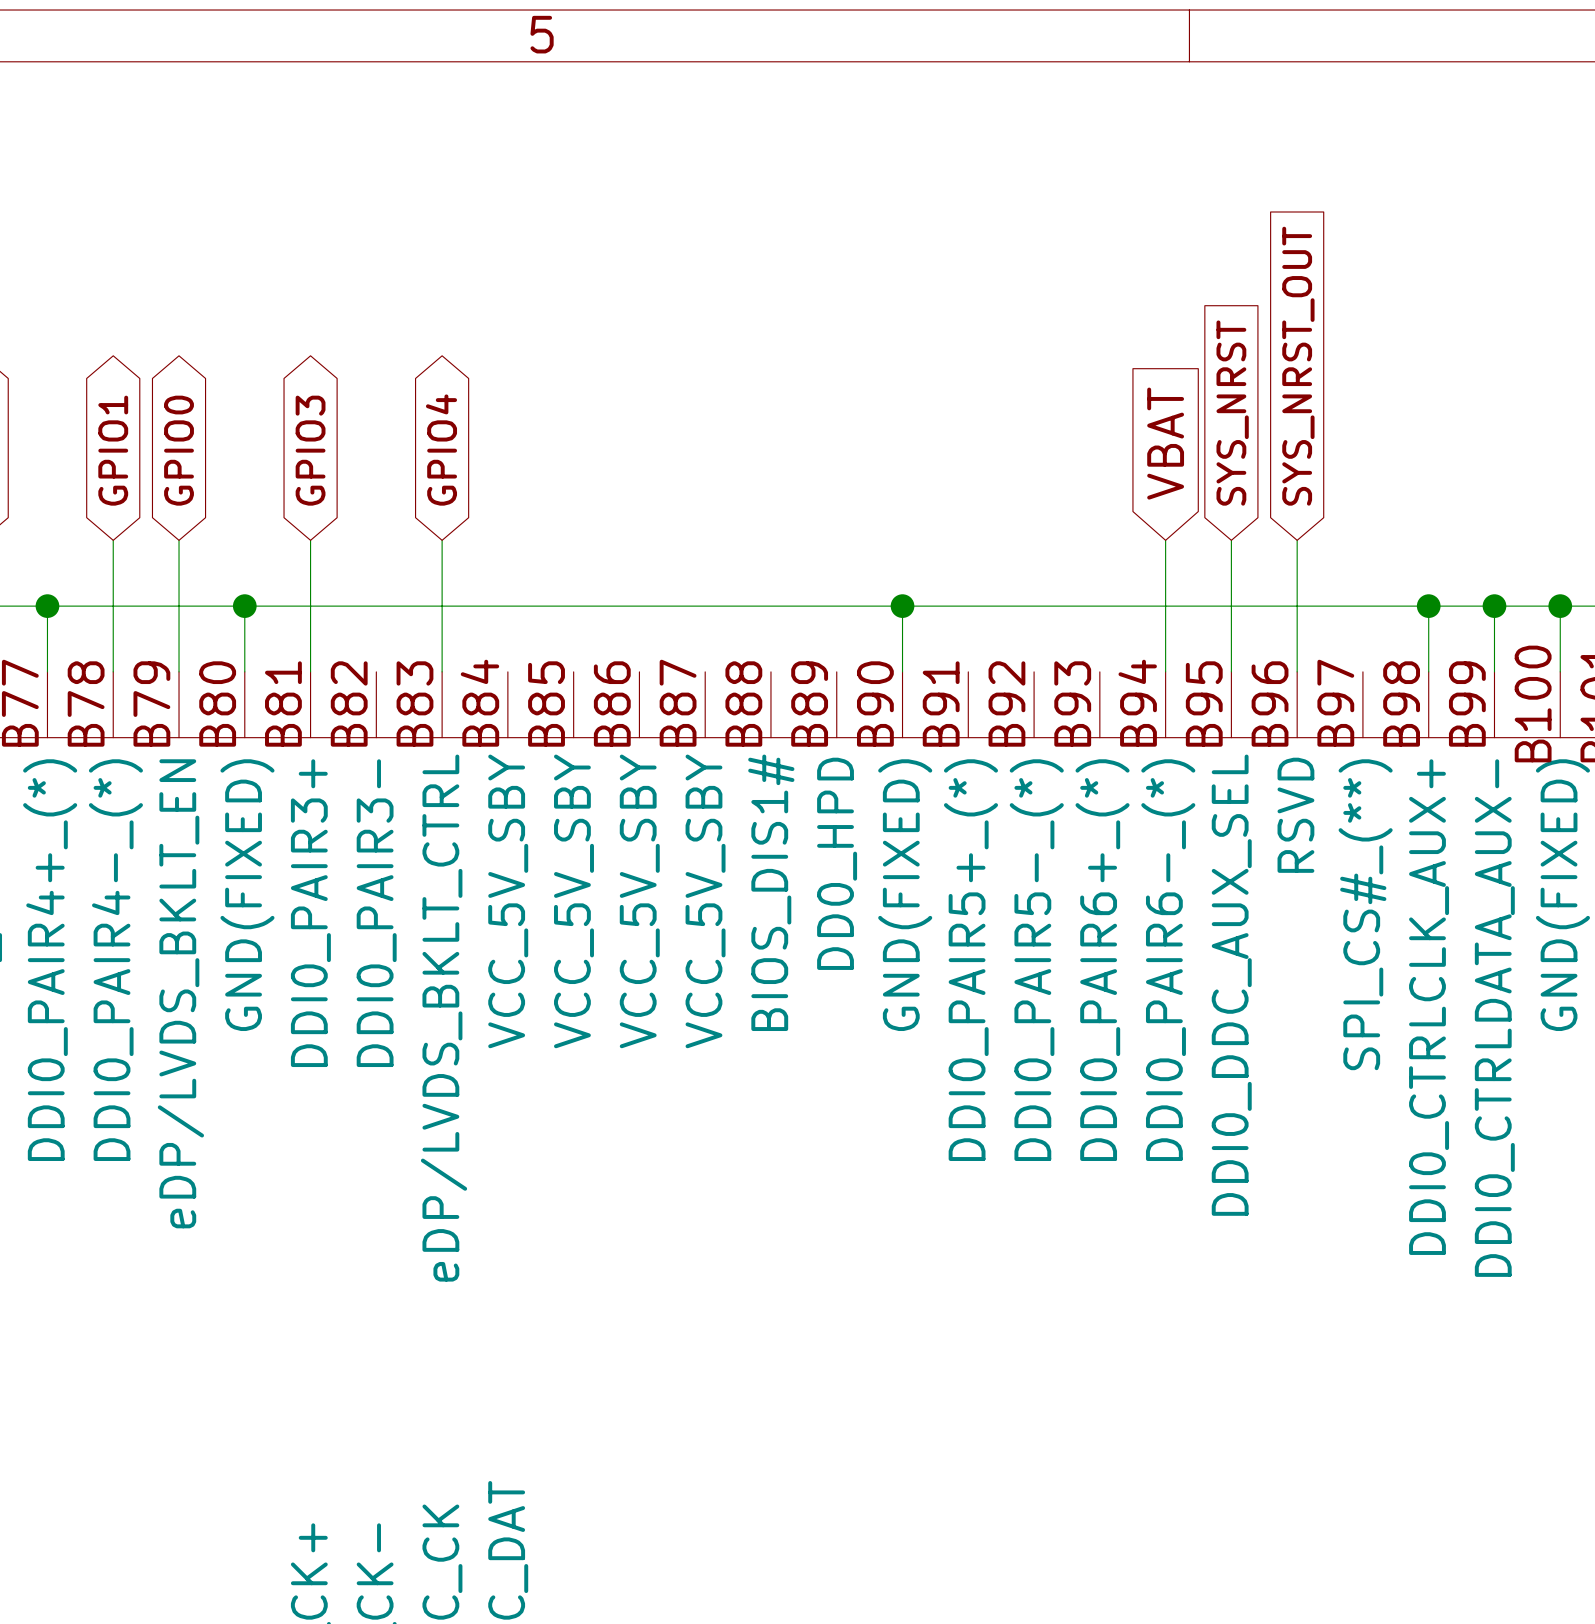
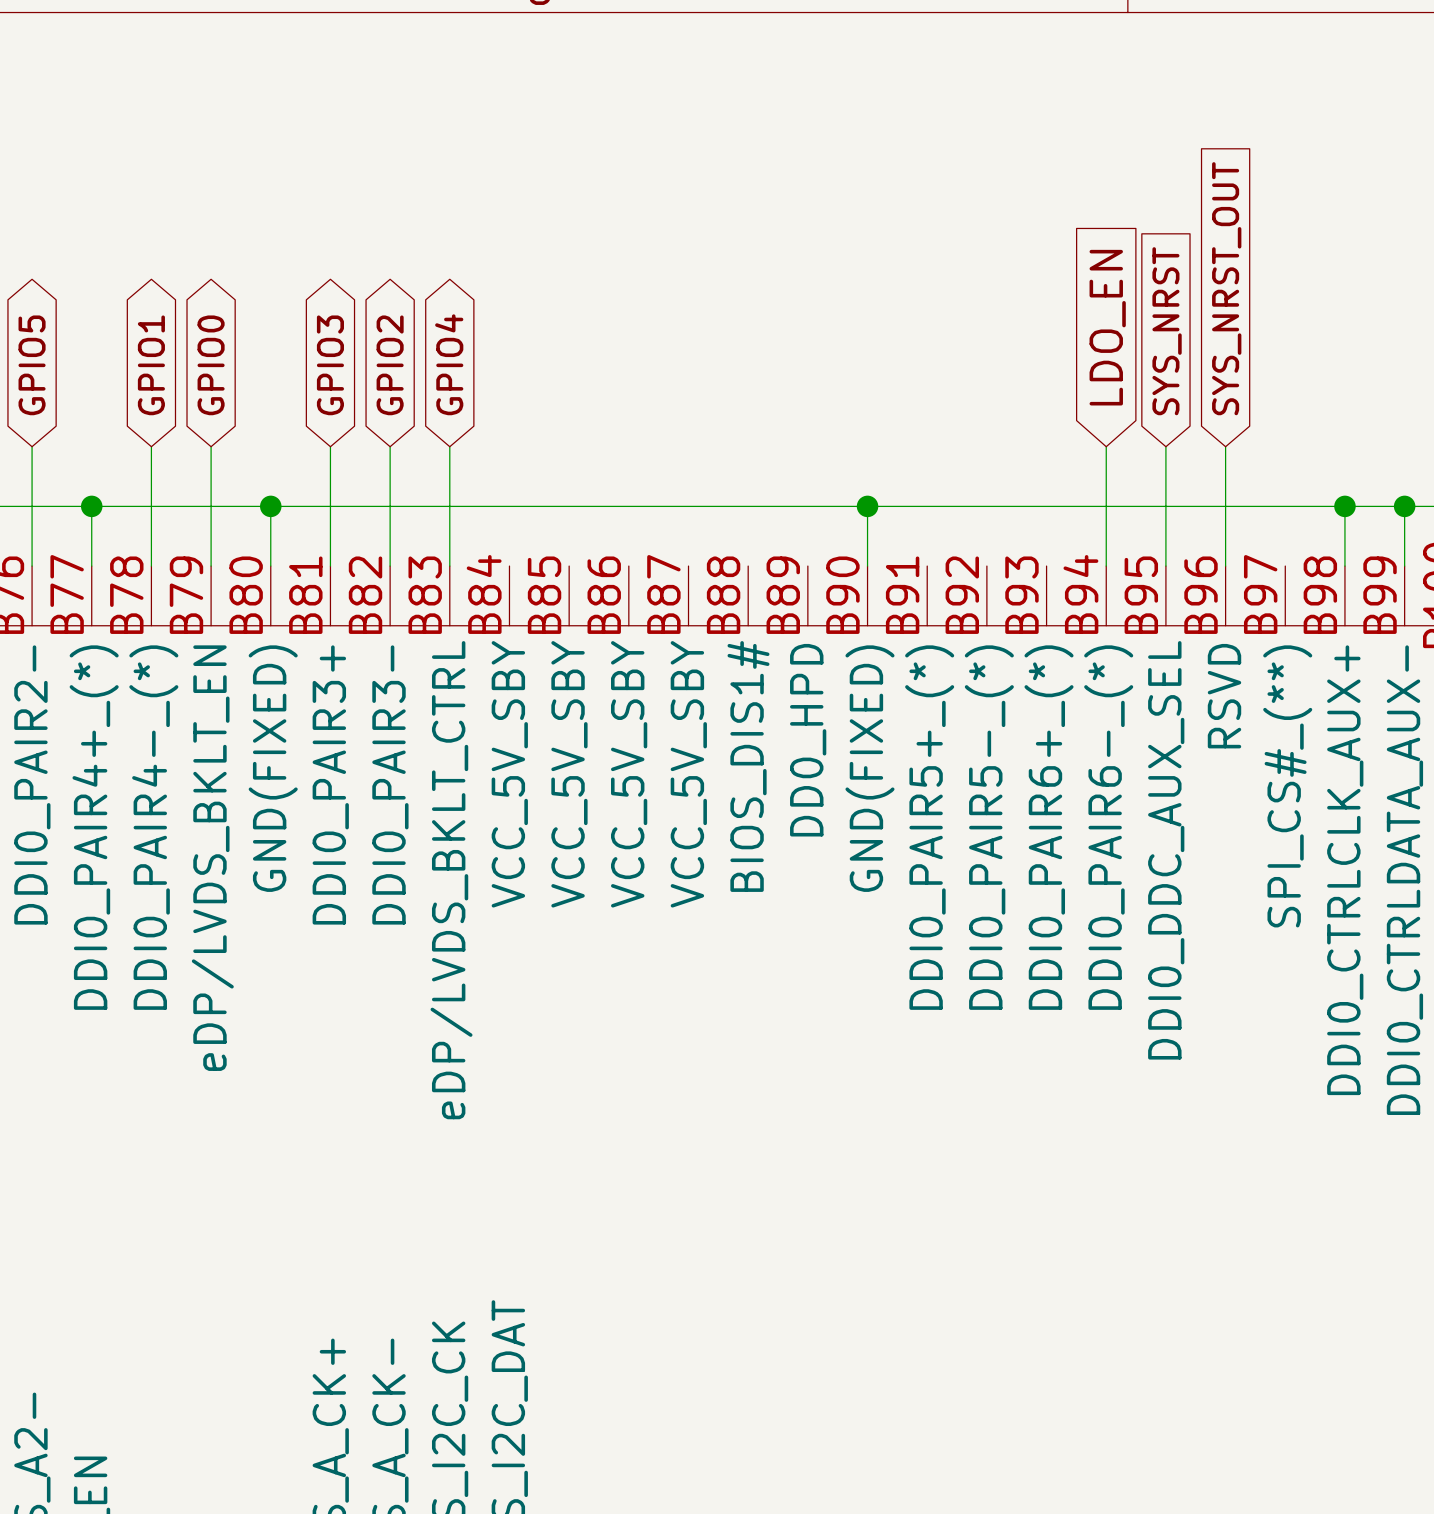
global label: VBAT (1165, 443) -> LDO_EN (1107, 327)
global label: none -> GPIO2 (390, 365)
wire: none -> (390, 446) (390, 566)

